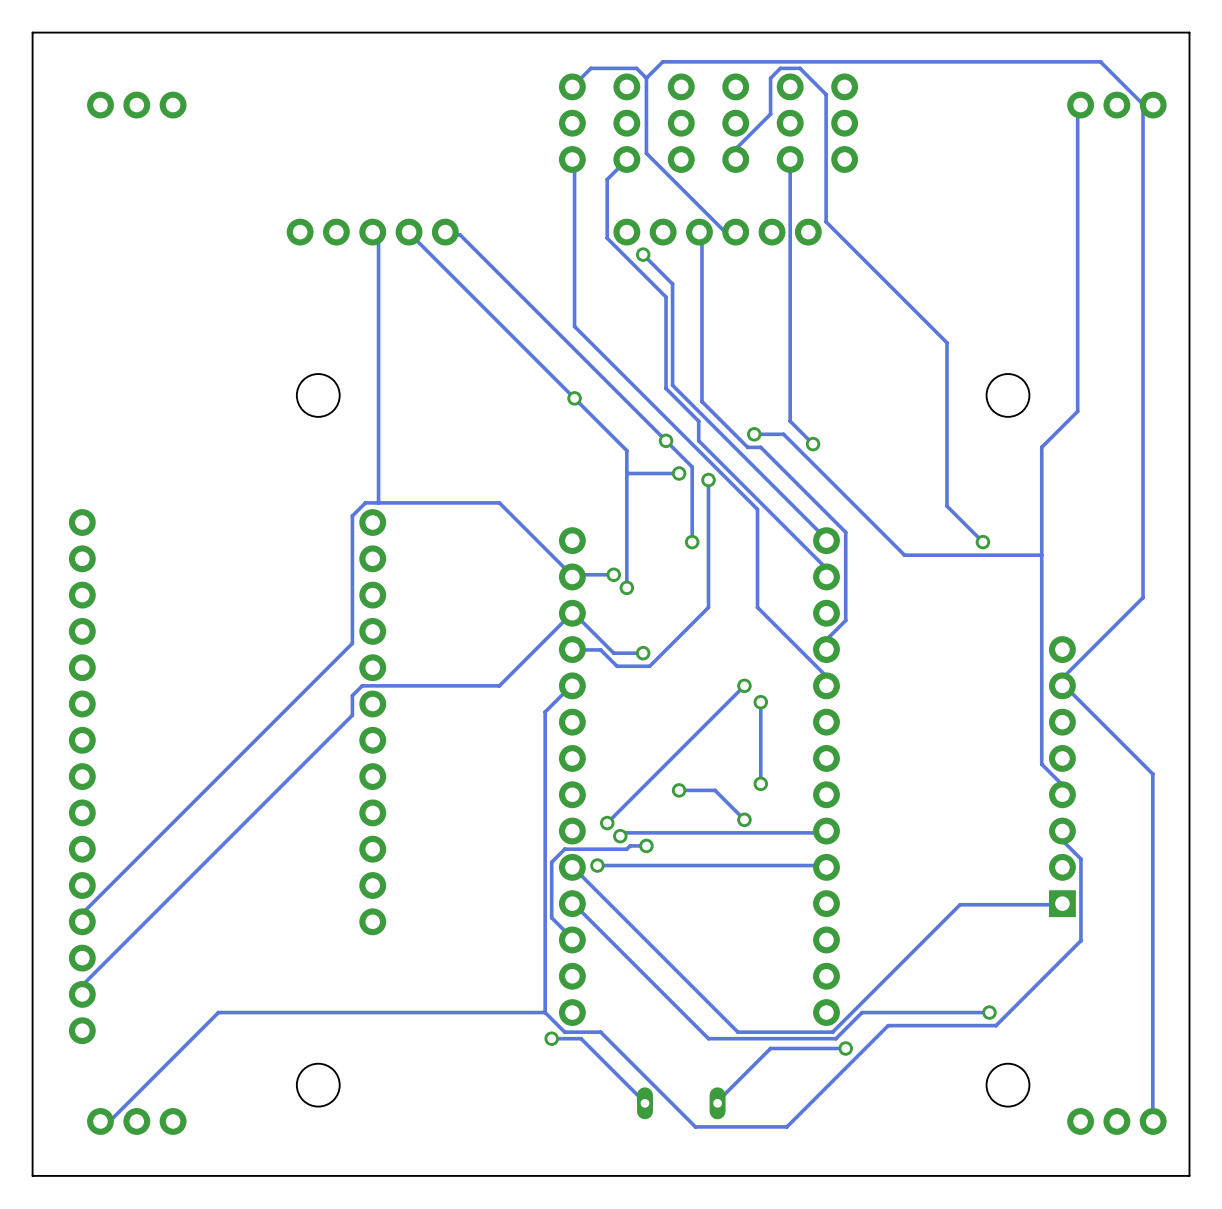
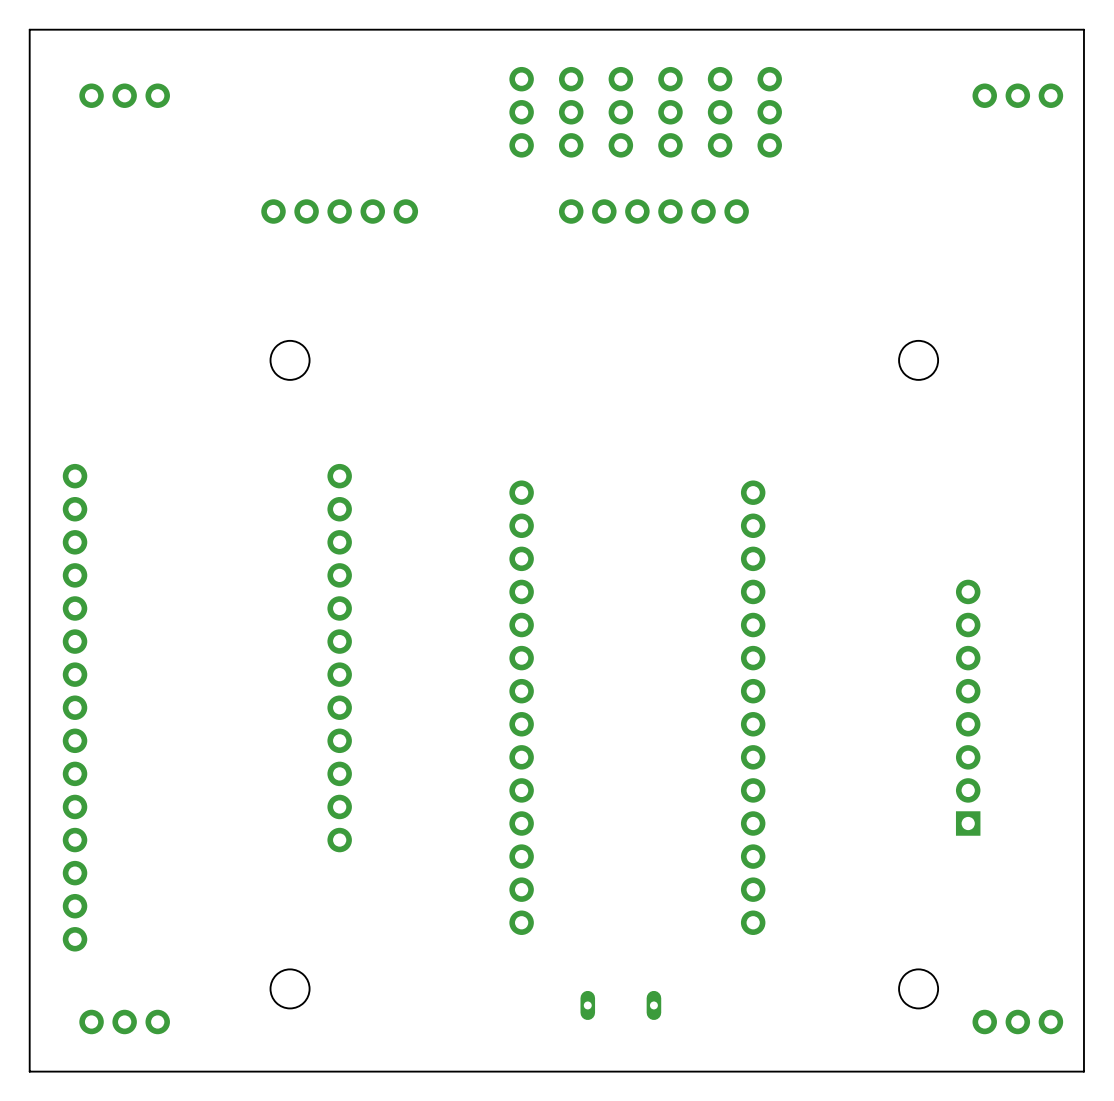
track: (646, 78) (646, 153) (724, 231) (735, 232) -> none
track: (646, 78) (636, 68) (590, 68) (572, 86) -> none
track: (646, 78) (662, 61) (1100, 61) (1143, 104) -> none
track: (1143, 104) (1143, 597) (1064, 676) (1064, 685) -> none
track: (1080, 105) (1077, 107) (1077, 411) (1041, 447) (1041, 764) (1061, 783) (1062, 794) -> none
track: (572, 159) (574, 159) (574, 326) (757, 509) (757, 607) (826, 676) (826, 685) -> none
track: (626, 159) (607, 179) (607, 238) (666, 297) (666, 388) (698, 421) (698, 440) (826, 568) (826, 576) -> none
track: (735, 159) (737, 156) (737, 146) (770, 114) (770, 78) (780, 68) (799, 68) (826, 94) (826, 221) (947, 342) (947, 506) (982, 542) -> none
track: (790, 159) (790, 421) (813, 444) -> none
track: (372, 232) (378, 238) (378, 502) -> none
track: (409, 232) (626, 450) (626, 587) -> none
track: (445, 232) (447, 235) (460, 235) (692, 466) (692, 542) -> none
track: (699, 232) (701, 235) (701, 401) (747, 447) (760, 447) (845, 532) (845, 620) (829, 636) (829, 646) (826, 649) -> none
track: (643, 254) (672, 284) (672, 385) (826, 540) -> none
via: (643, 254) -> none
via: (574, 398) -> none
track: (754, 434) (783, 434) (904, 555) (1041, 555) -> none
via: (754, 434) -> none
via: (666, 440) -> none
via: (813, 444) -> none
track: (679, 473) (626, 473) -> none
via: (679, 473) -> none
track: (708, 480) (708, 607) (649, 666) (617, 666) (600, 649) (572, 649) -> none
via: (708, 480) -> none
via: (692, 542) -> none
via: (982, 542) -> none
track: (613, 574) (574, 574) (572, 576) (499, 502) (365, 502) (352, 515) (352, 643) (84, 911) (84, 921) (82, 921) -> none
via: (613, 574) -> none
via: (626, 587) -> none
track: (643, 653) (613, 653) (572, 613) (499, 685) (362, 685) (352, 695) (352, 715) (84, 983) (84, 992) (82, 994) -> none
via: (643, 653) -> none
track: (572, 685) (545, 711) (545, 1012) -> none
track: (744, 685) (607, 823) -> none
via: (744, 685) -> none
track: (1064, 685) (1152, 774) (1153, 1121) -> none
track: (760, 702) (760, 783) -> none
via: (760, 702) -> none
via: (760, 783) -> none
track: (679, 790) (715, 790) (744, 819) -> none
via: (679, 790) -> none
via: (744, 819) -> none
via: (607, 823) -> none
track: (826, 831) (826, 832) (623, 832) (620, 836) -> none
track: (1062, 831) (1064, 832) (1064, 842) (1080, 859) (1080, 940) (996, 1025) (888, 1025) (786, 1126) (695, 1126) (600, 1032) (564, 1032) (545, 1012) -> none
via: (620, 836) -> none
track: (646, 845) (630, 845) (626, 849) (564, 849) (551, 862) (551, 917) (572, 939) -> none
via: (646, 845) -> none
track: (597, 865) (826, 865) (826, 867) -> none
via: (597, 865) -> none
track: (572, 867) (737, 1032) (832, 1032) (960, 904) (1062, 903) -> none
track: (572, 903) (708, 1038) (835, 1038) (862, 1012) (989, 1012) -> none
track: (545, 1012) (218, 1012) (110, 1120) (100, 1121) -> none
via: (989, 1012) -> none
track: (551, 1038) (581, 1038) (644, 1103) -> none
via: (551, 1038) -> none
track: (845, 1048) (770, 1048) (717, 1103) -> none
via: (845, 1048) -> none

